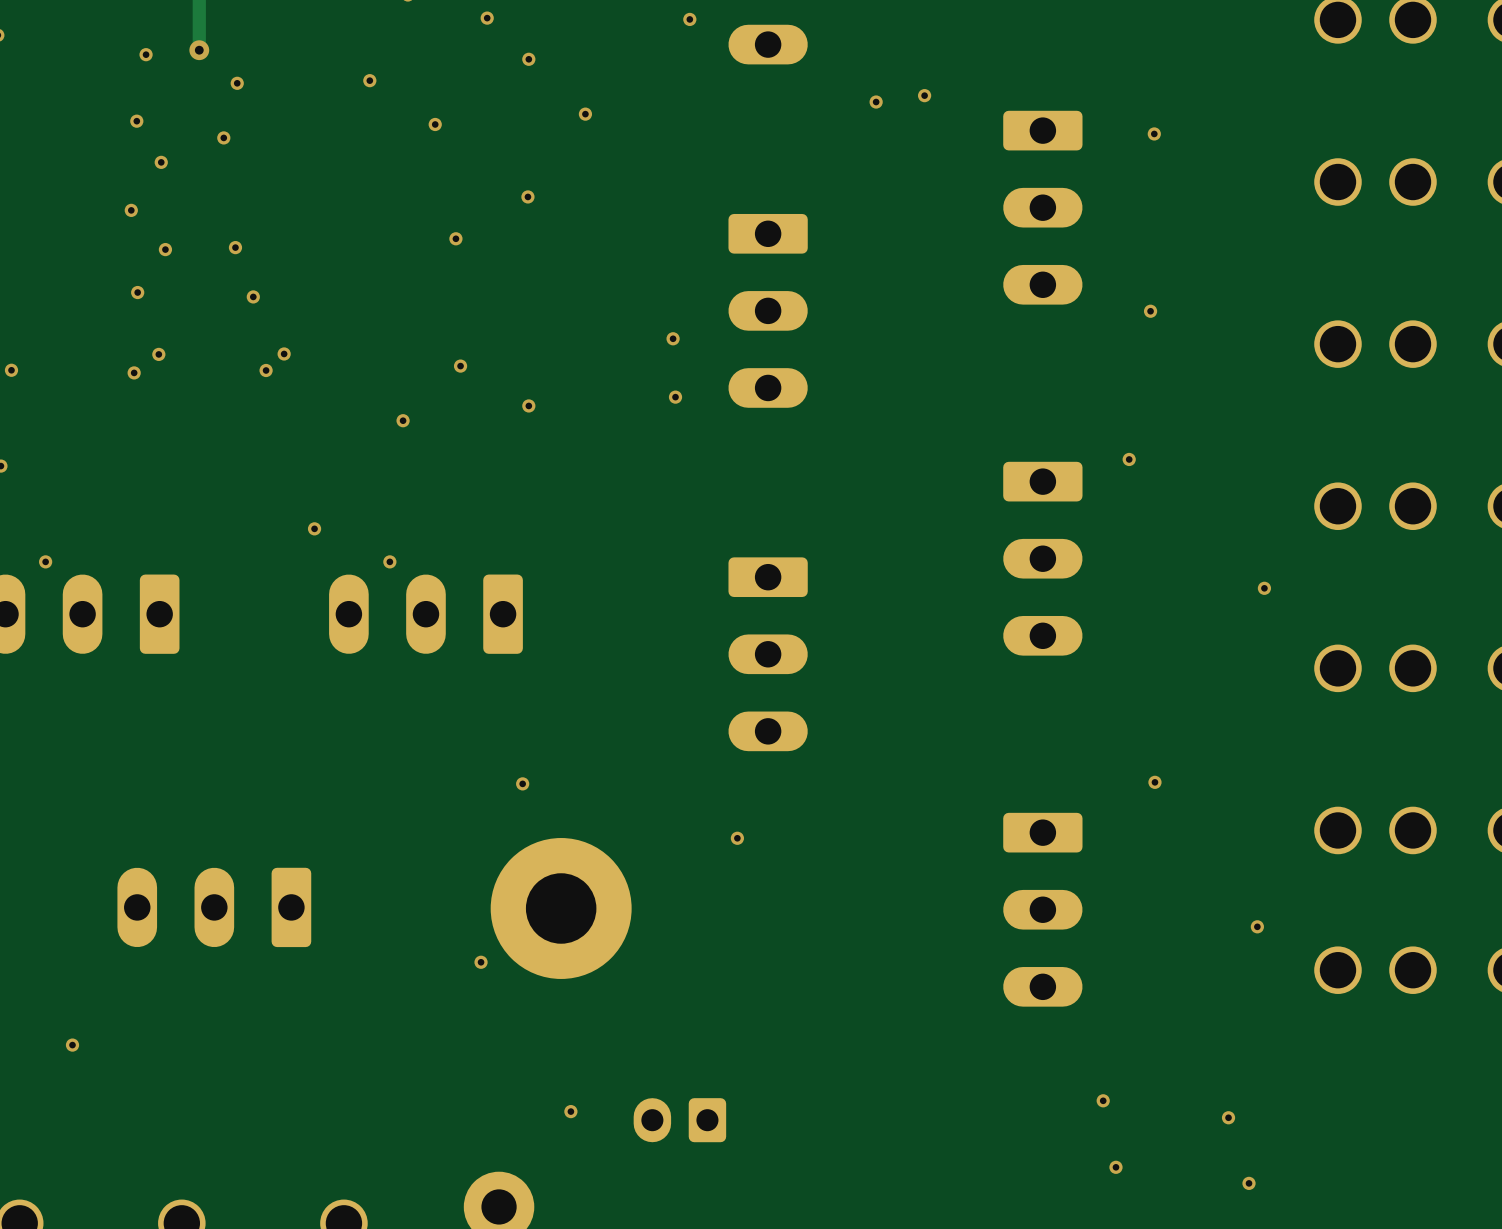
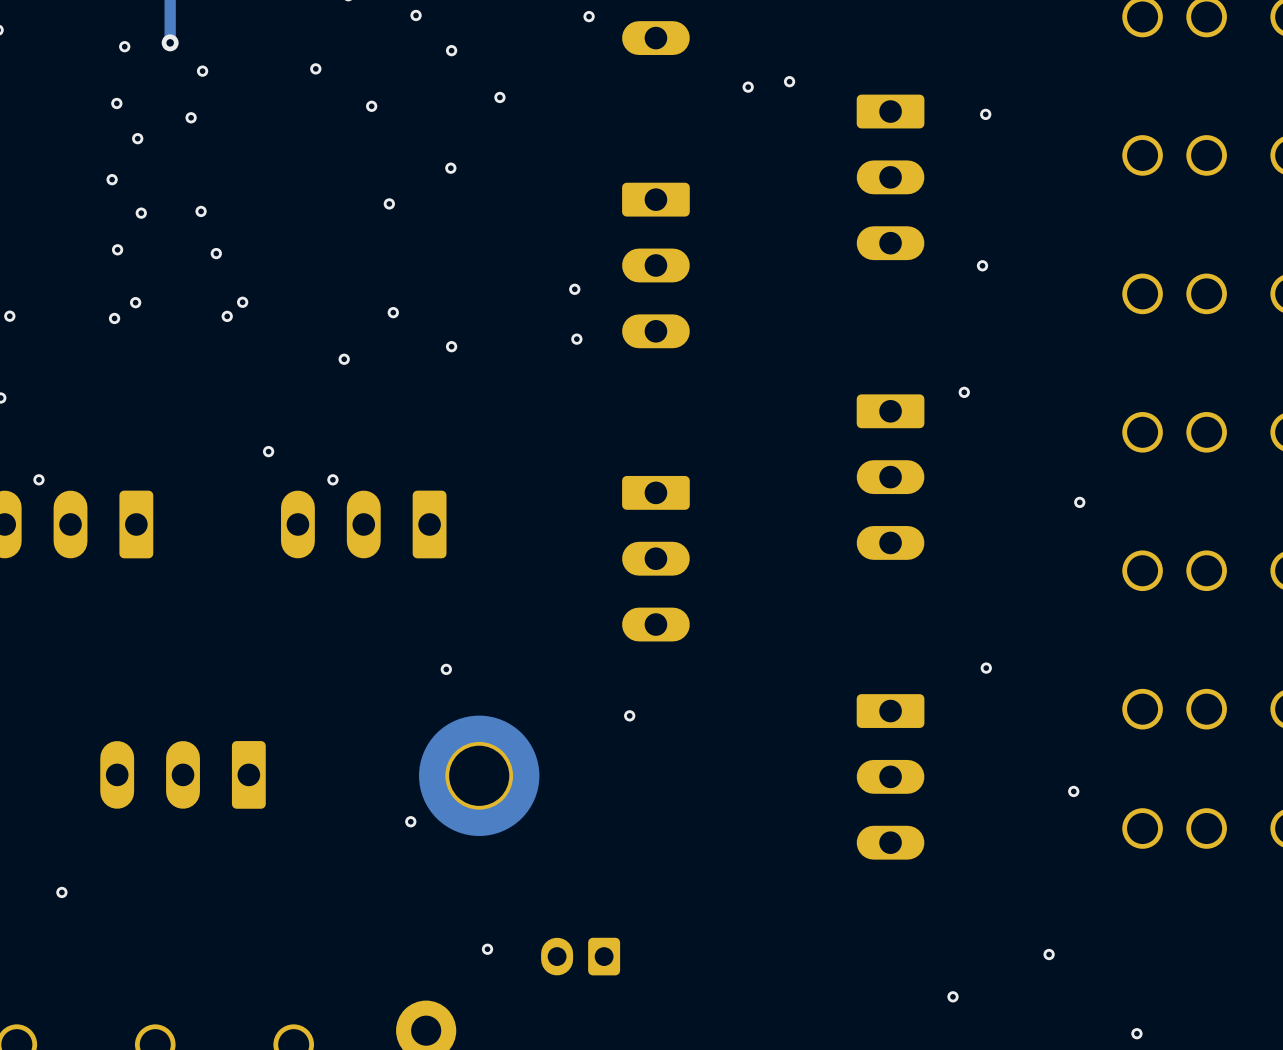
via: (1103, 1100) -> none
via position: (1249, 1183) -> (1136, 1033)

